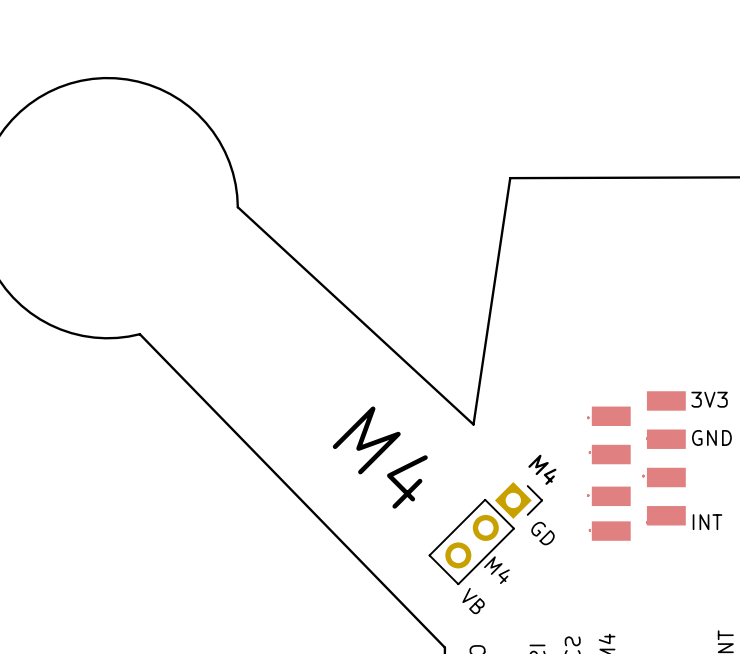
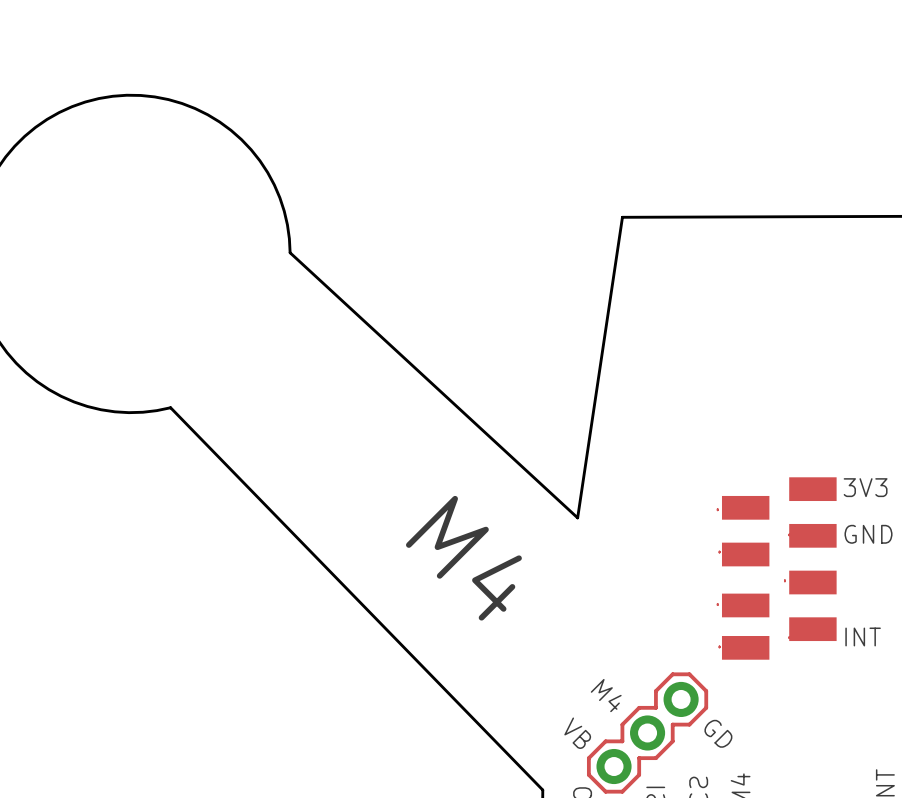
M4: (485, 533) -> none
text position: GD (542, 533) -> GD (718, 733)
part: none -> (647, 732)

